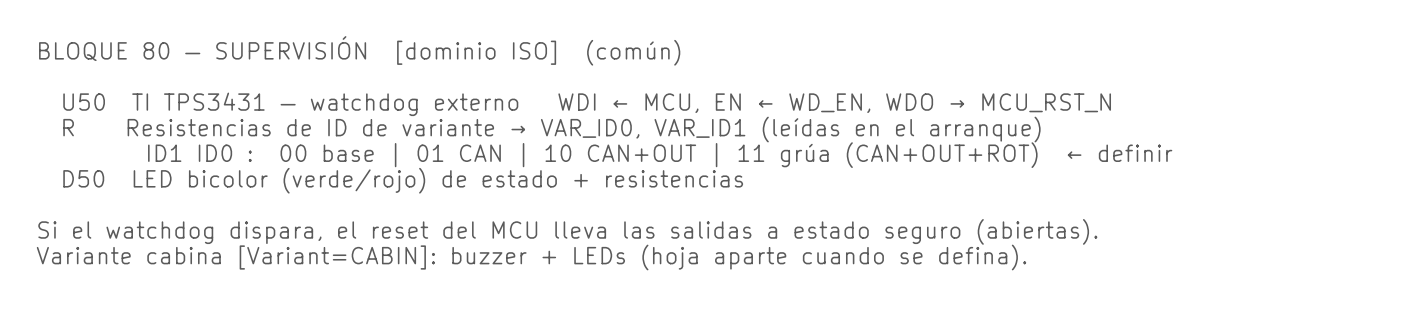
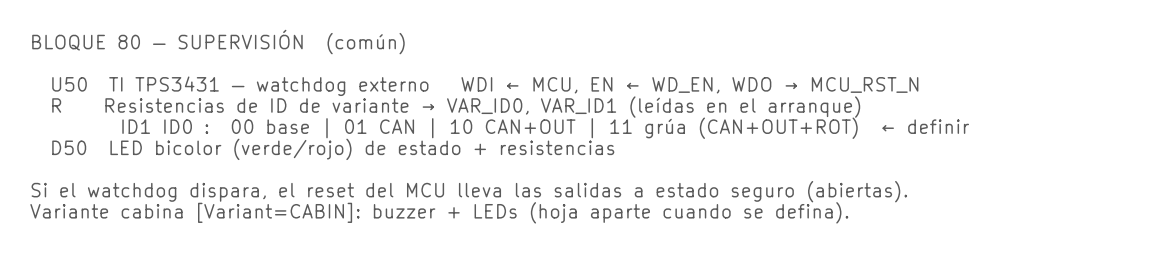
text: BLOQUE 80 — SUPERVISIÓN [dominio ISO] (común) (359, 50) -> BLOQUE 80 — SUPERVISIÓN (común) (218, 42)

